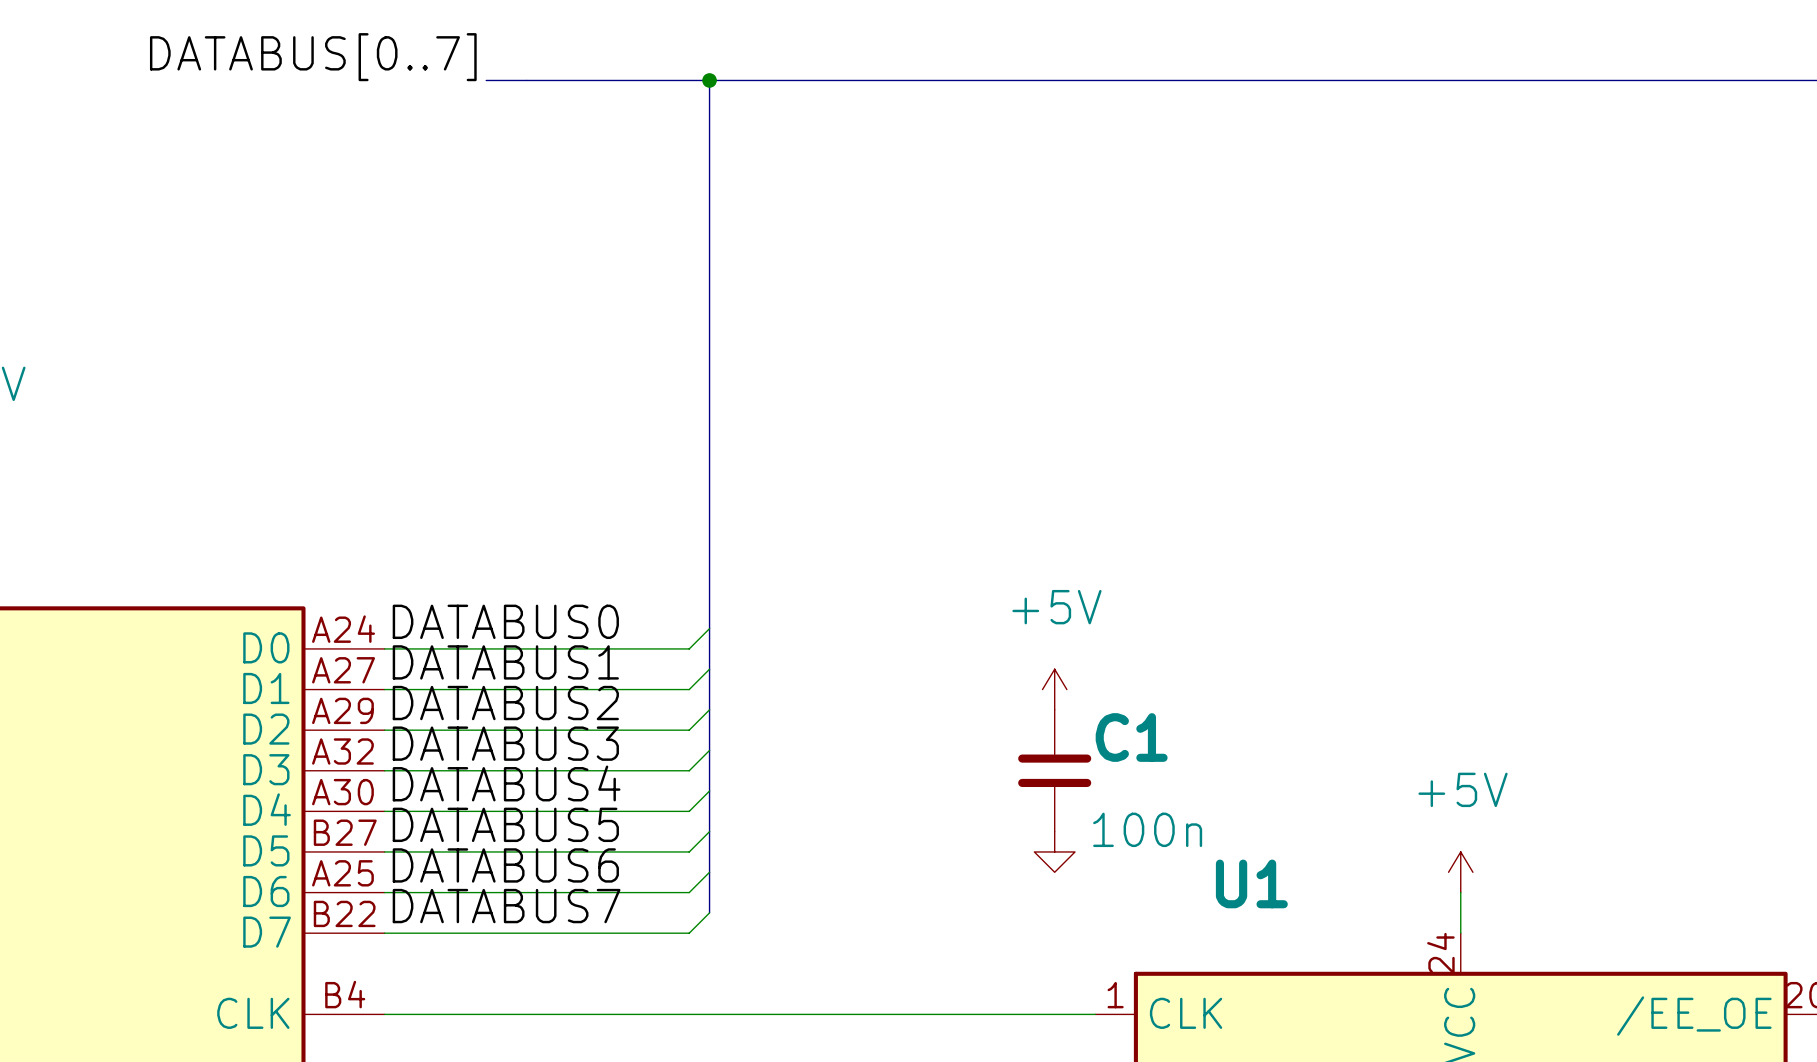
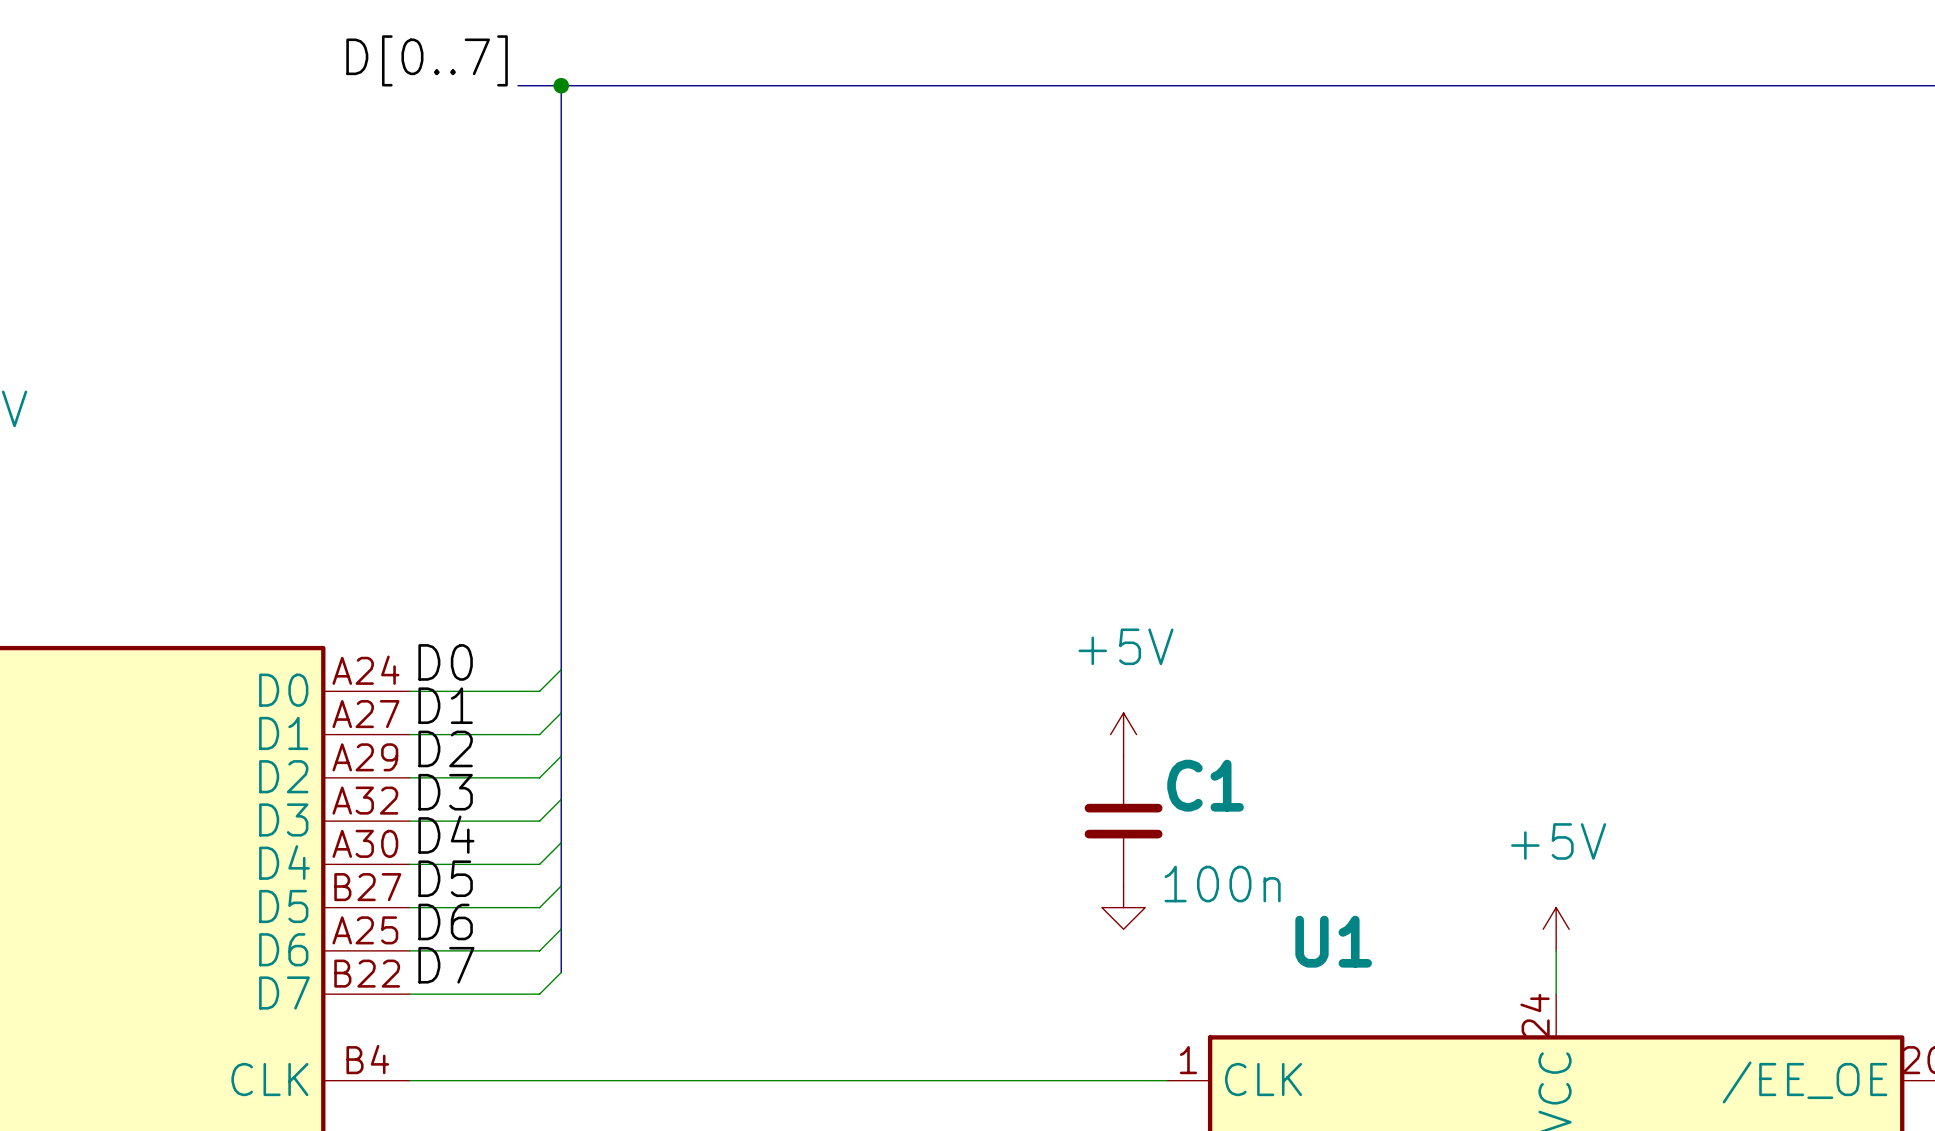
label: DATABUS[0..7] (313, 57) -> D[0..7] (427, 60)
junction: none -> (561, 85)
bus: (709, 80) (709, 912) -> (561, 85) (561, 972)
junction: (709, 80) -> none
label: DATABUS0 (505, 621) -> D0 (445, 662)
wire: (709, 628) (689, 648) (506, 648) -> (561, 669) (539, 691)
label: DATABUS1 (505, 662) -> D1 (445, 705)
wire: (709, 669) (689, 689) (506, 689) -> (561, 712) (539, 734)
label: DATABUS2 (505, 703) -> D2 (445, 748)
wire: (709, 709) (689, 730) (506, 730) -> (561, 756) (539, 777)
label: DATABUS3 (505, 743) -> D3 (445, 792)
wire: (709, 750) (689, 770) (506, 770) -> (561, 799) (539, 821)
label: DATABUS4 (506, 783) -> D4 (446, 834)
wire: (709, 791) (689, 811) (506, 811) -> (561, 842) (539, 864)
label: DATABUS5 (505, 824) -> D5 (445, 878)
wire: (709, 831) (689, 851) (506, 851) -> (561, 886) (539, 907)
label: DATABUS6 (505, 865) -> D6 (445, 921)
wire: (709, 872) (689, 892) (506, 892) -> (561, 929) (539, 950)
label: DATABUS7 (506, 906) -> D7 (446, 965)
wire: (709, 912) (689, 933) (506, 933) -> (561, 972) (539, 994)

